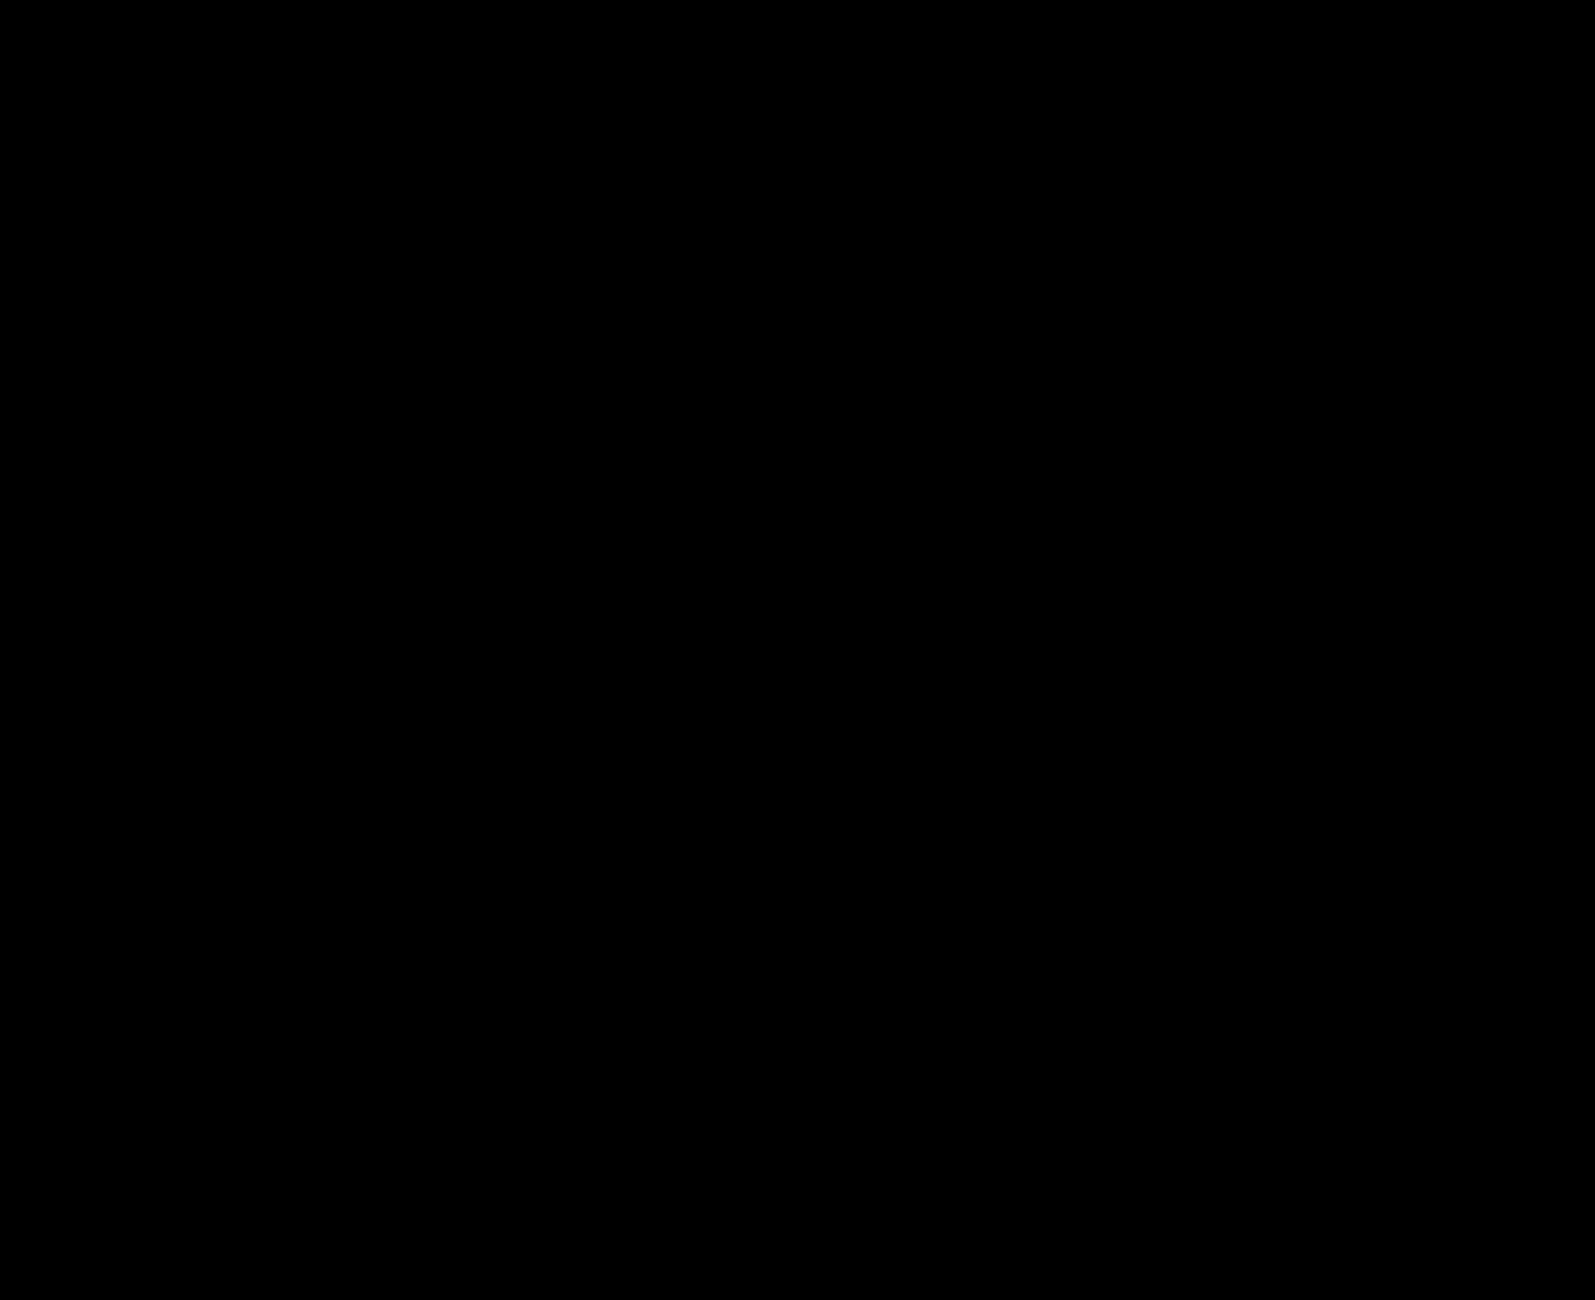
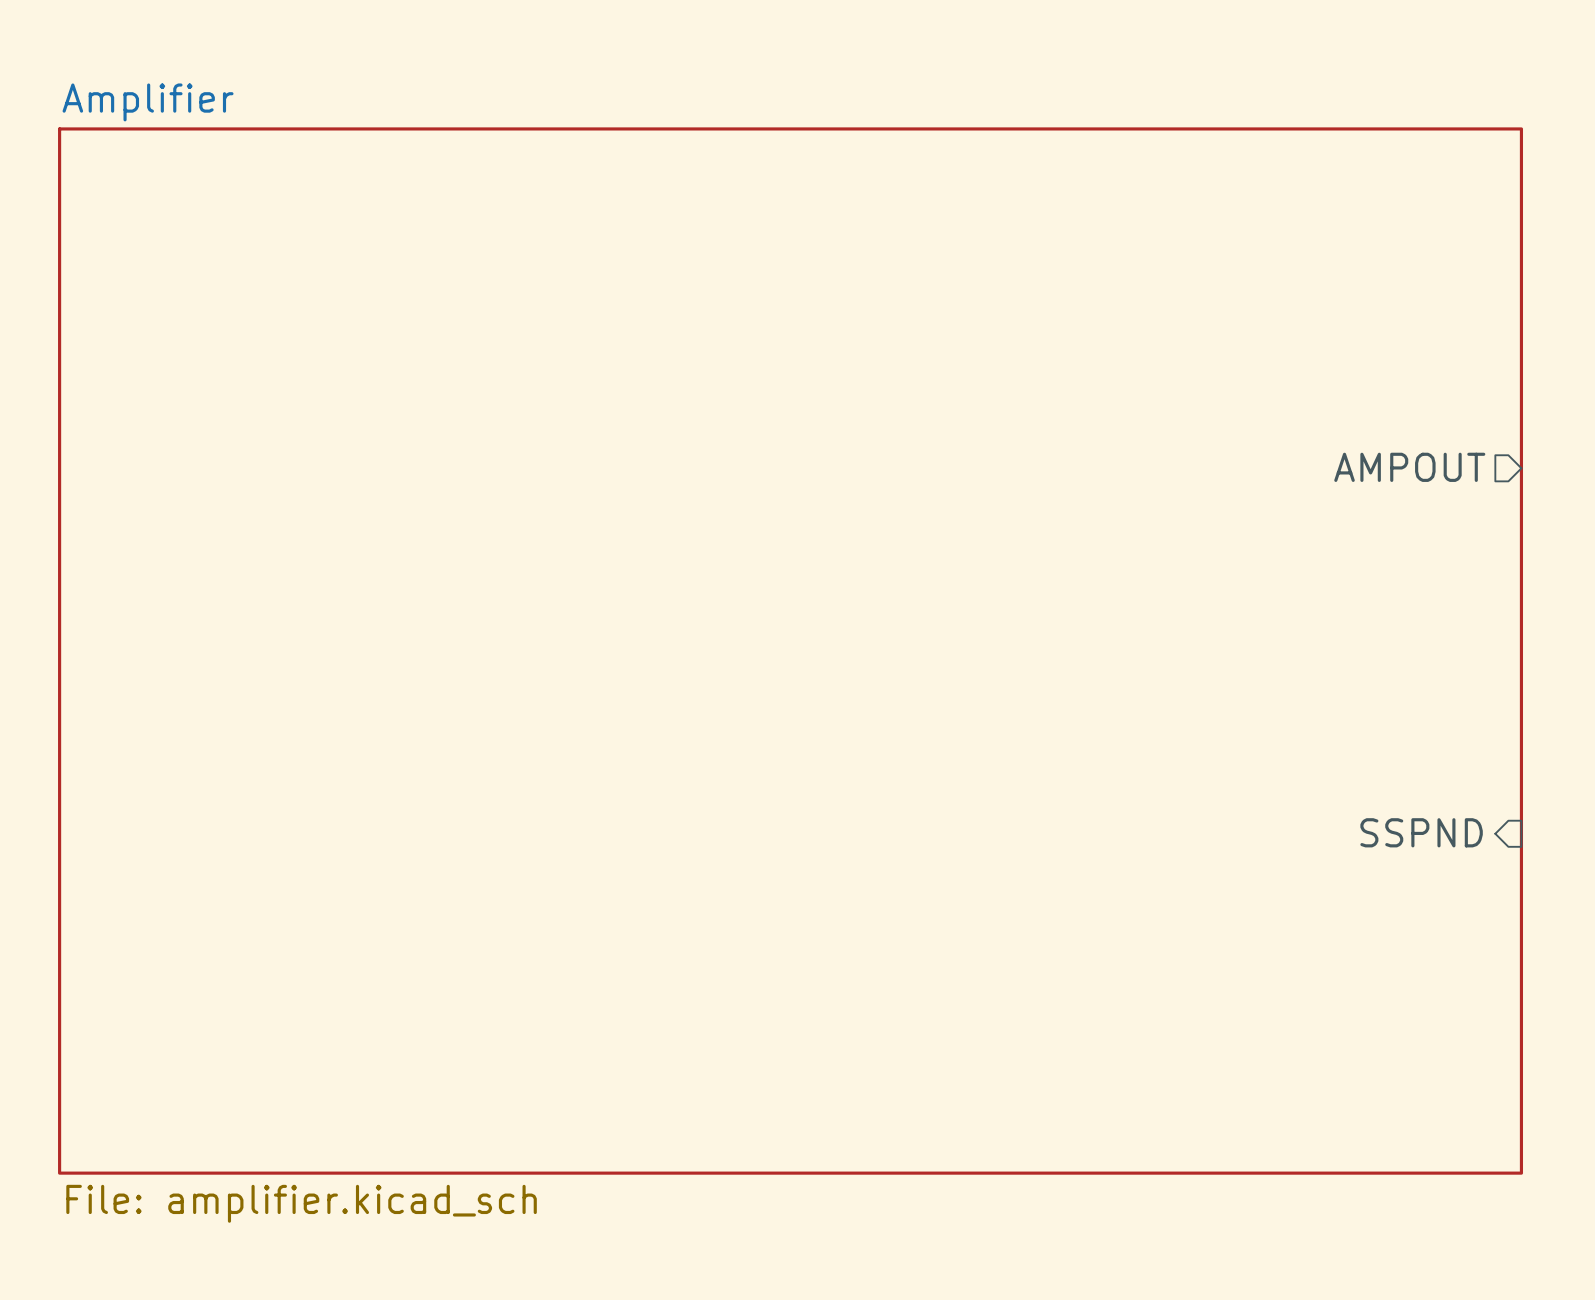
sheet pin: none -> AMPOUT (1409, 467)
sheet Amplifier: none -> File: amplifier.kicad_sch (790, 651)
sheet pin: none -> SSPND (1421, 832)

